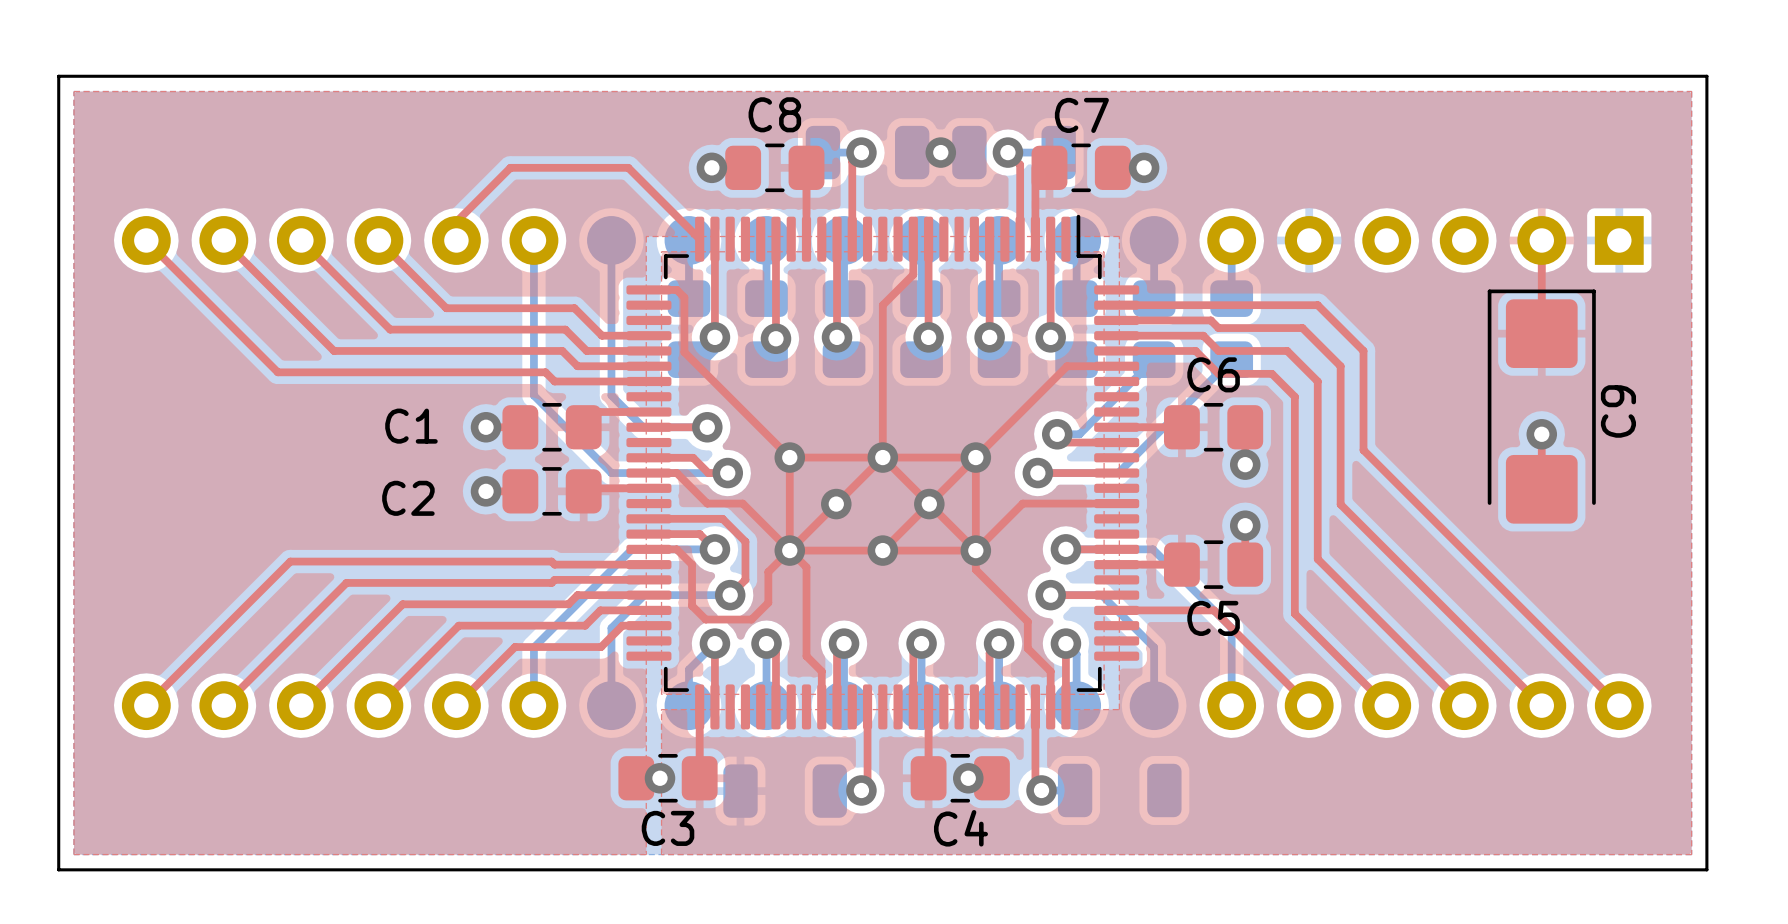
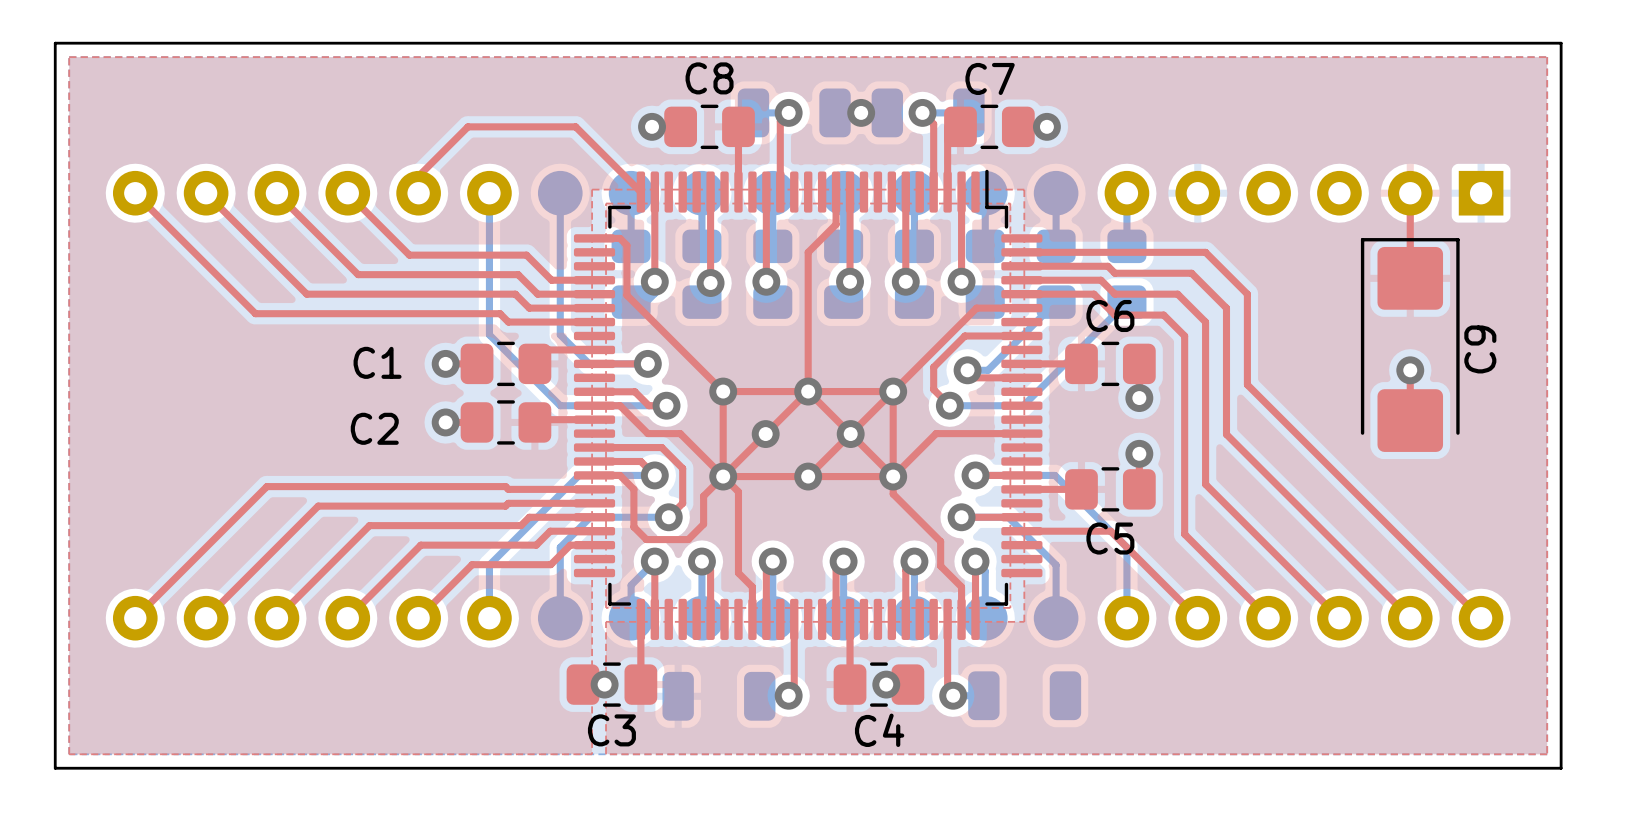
top track: (1037, 473) (1116, 473) -> (949, 405) (933, 389) (933, 367) (964, 336) (1021, 336)

